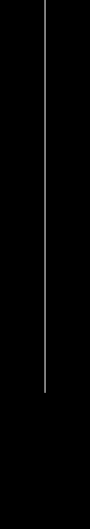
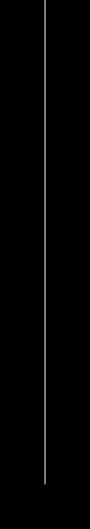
bus: none -> (45, 392) (45, 483)

